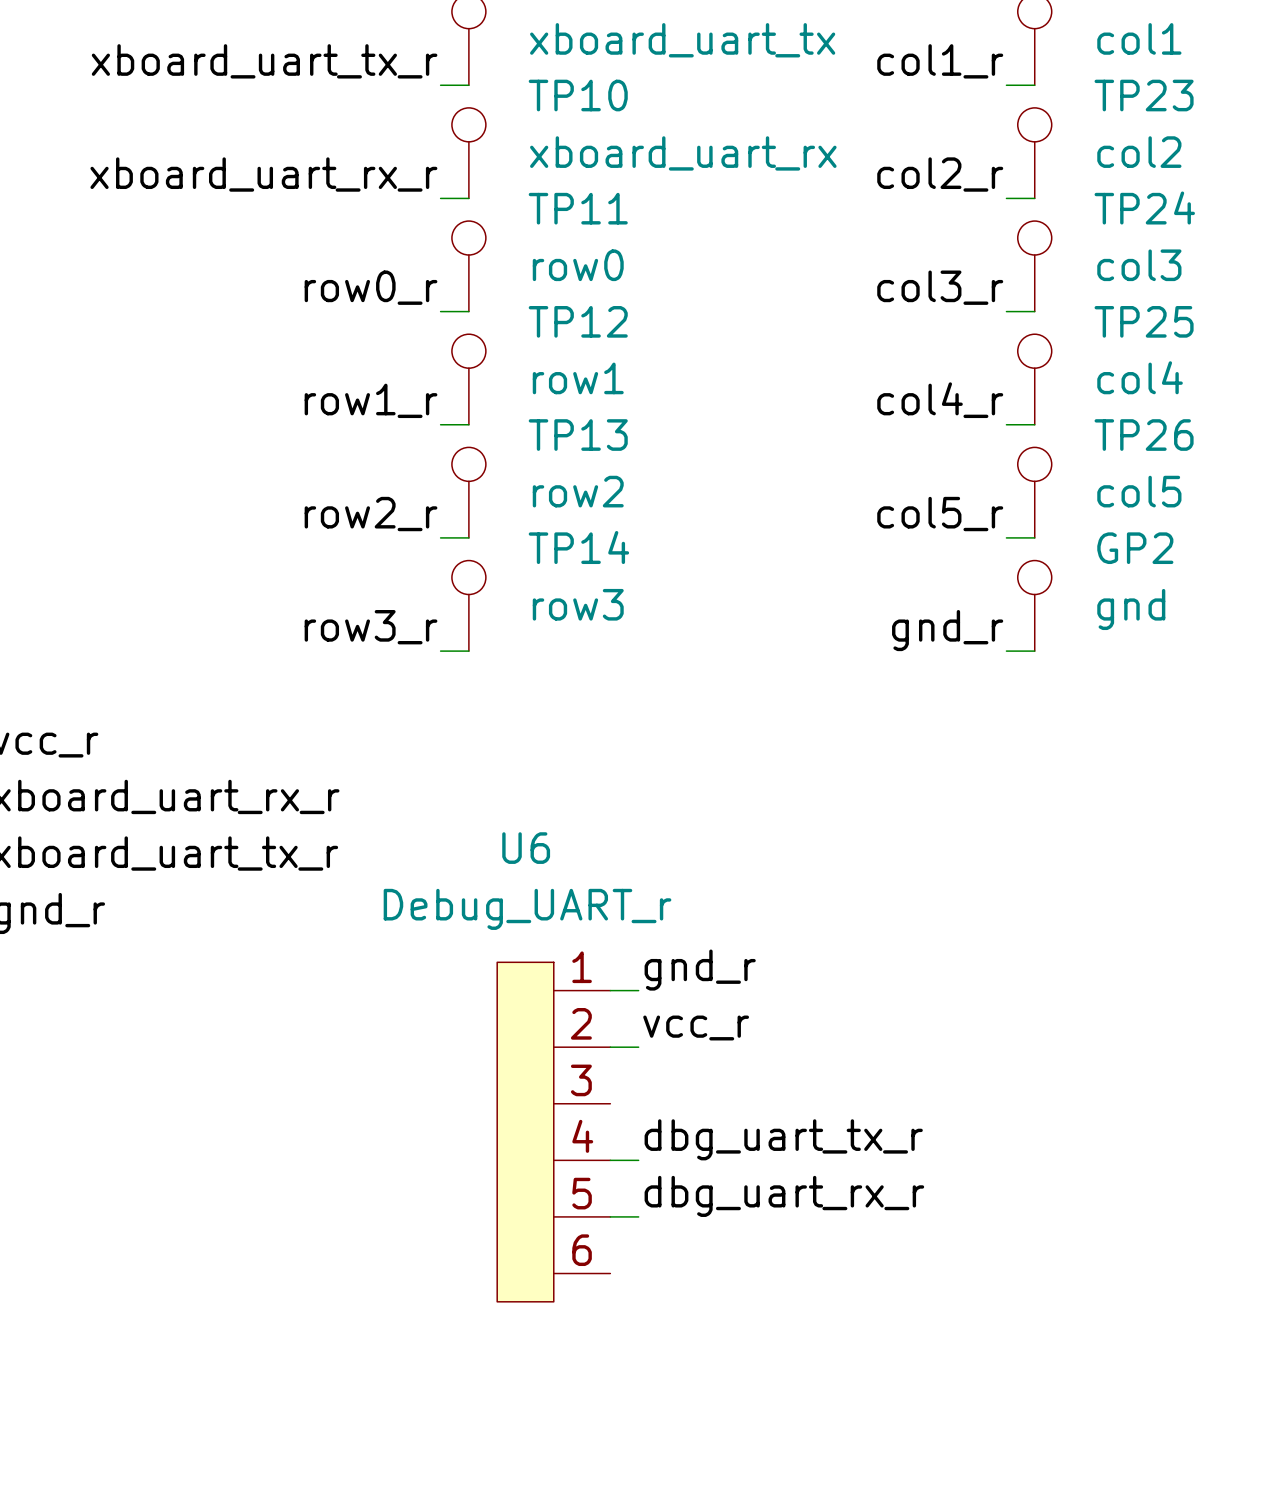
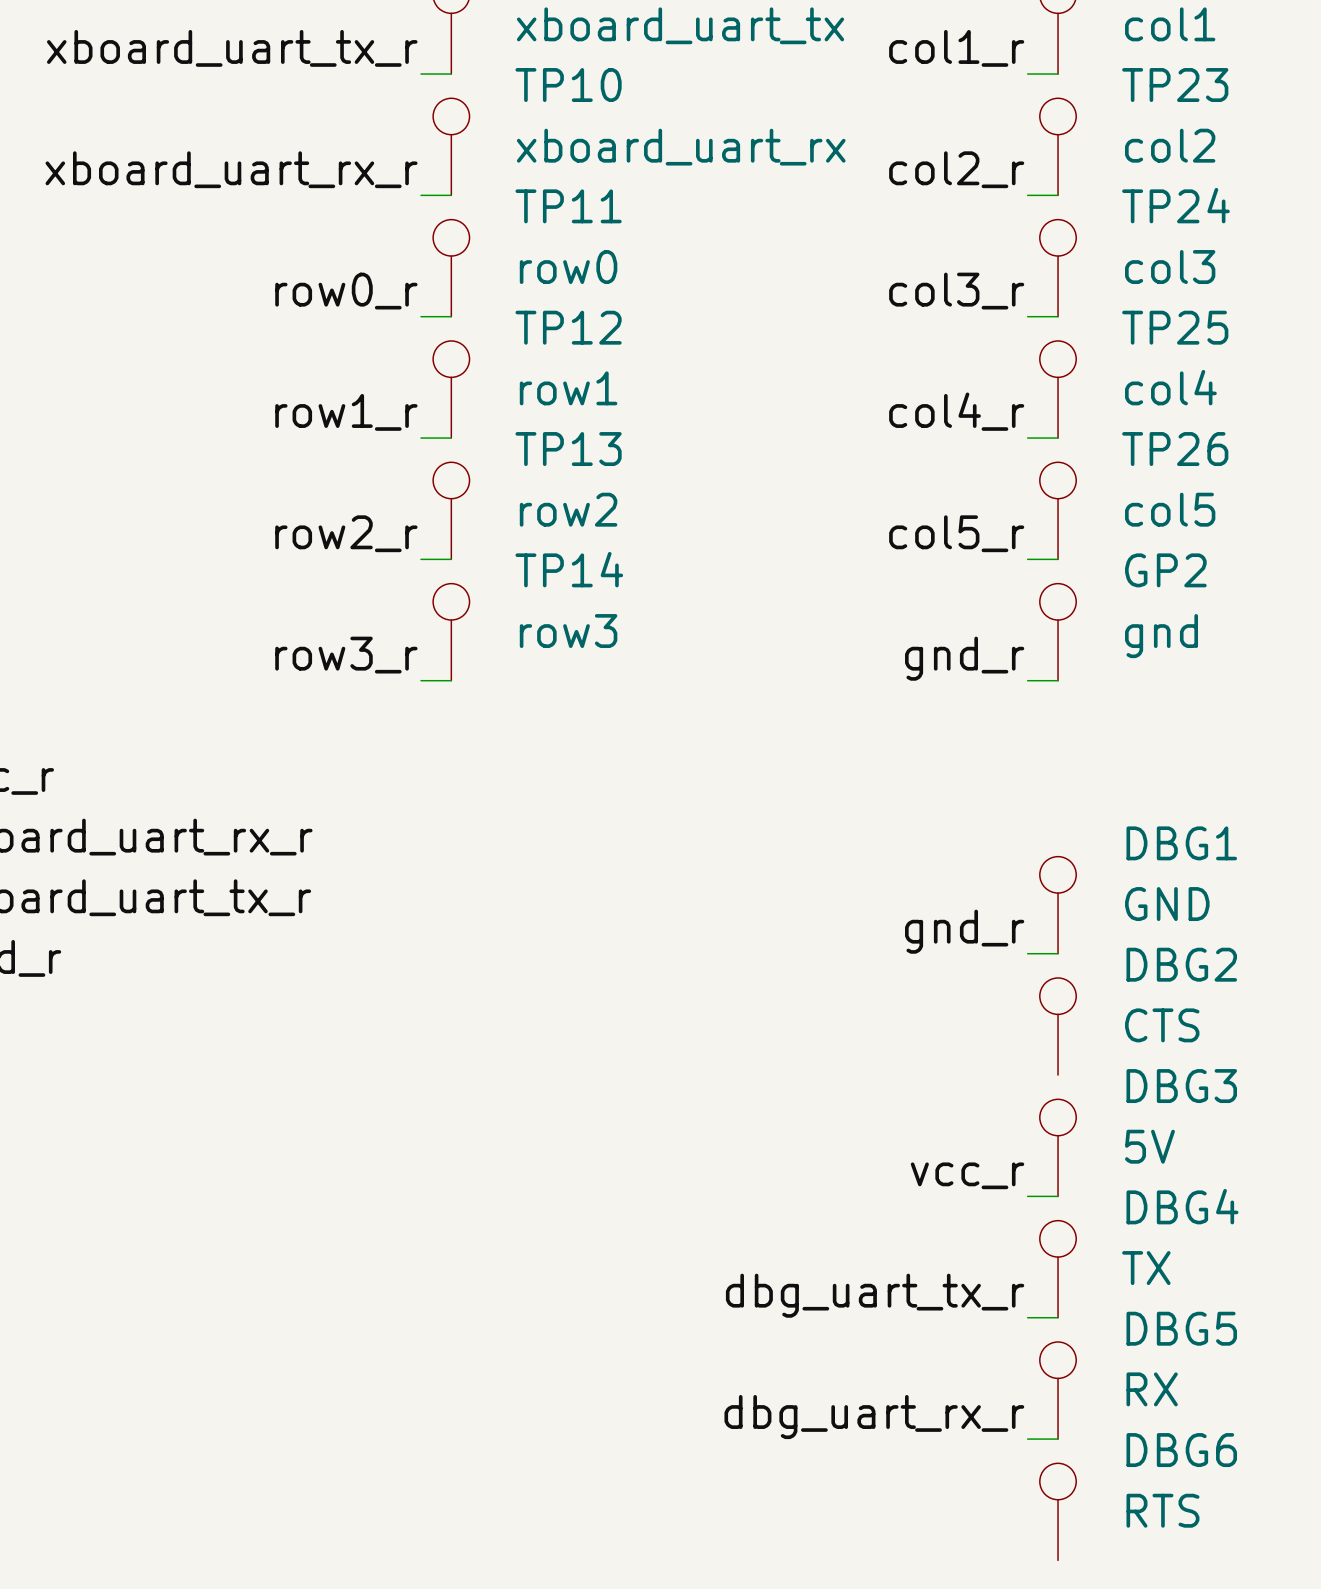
DBG1: none -> GND (1058, 905)
label position: gnd_r (700, 970) -> gnd_r (964, 931)
DBG2: none -> CTS (1058, 1026)
wire: (610, 990) (638, 990) -> (1027, 953) (1058, 953)
label position: vcc_r (696, 1028) -> vcc_r (967, 1175)
wire: (610, 1047) (638, 1047) -> (1027, 1196) (1058, 1196)
DBG3: none -> 5V (1058, 1147)
U6: Debug_UART_r (553, 1132) -> none
label position: dbg_uart_tx_r (783, 1139) -> dbg_uart_tx_r (875, 1295)
wire: (610, 1160) (638, 1160) -> (1027, 1317) (1058, 1317)
label position: dbg_uart_rx_r (784, 1196) -> dbg_uart_rx_r (874, 1417)
DBG4: none -> TX (1058, 1269)
wire: (610, 1216) (638, 1216) -> (1027, 1439) (1058, 1439)
DBG5: none -> RX (1058, 1390)
DBG6: none -> RTS (1058, 1511)

